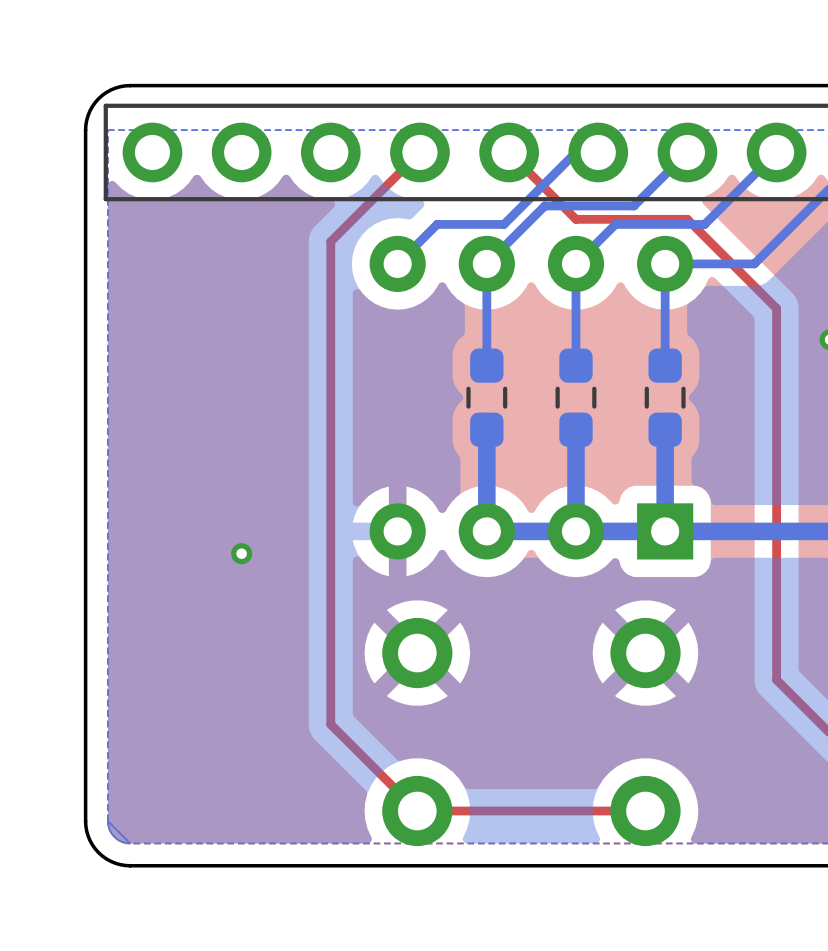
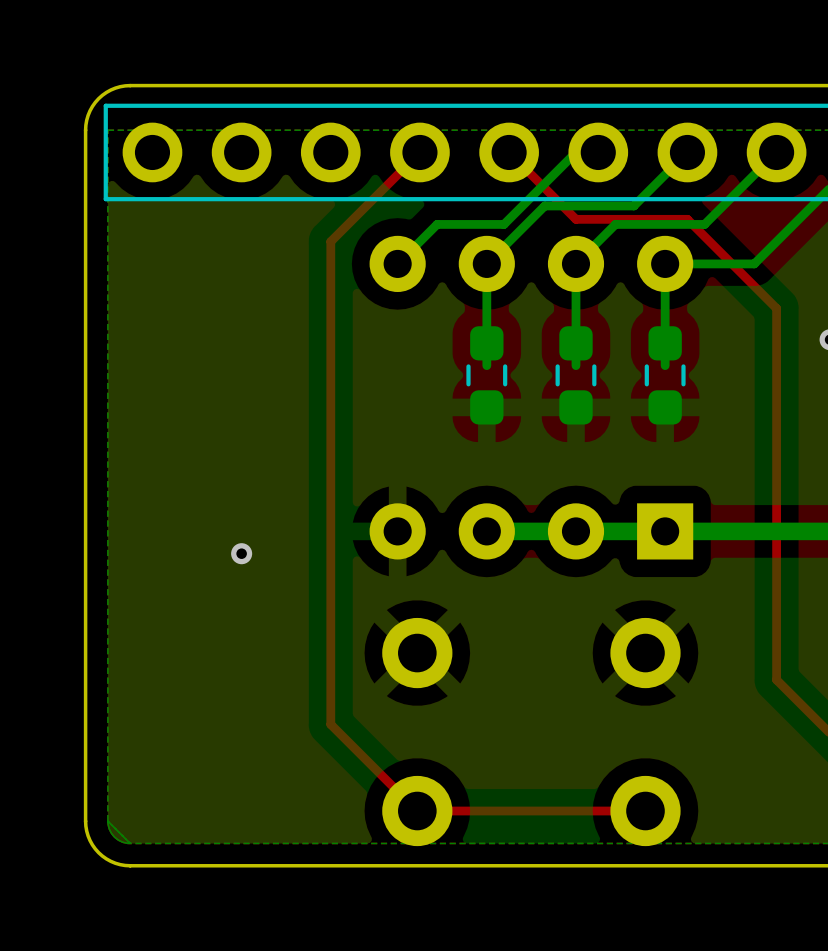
part position: (486, 397) -> (486, 375)
part position: (575, 397) -> (575, 375)
part position: (665, 397) -> (665, 375)
bottom track: (486, 429) (486, 531) -> none
bottom track: (575, 429) (575, 531) -> none
bottom track: (665, 429) (665, 531) -> none

